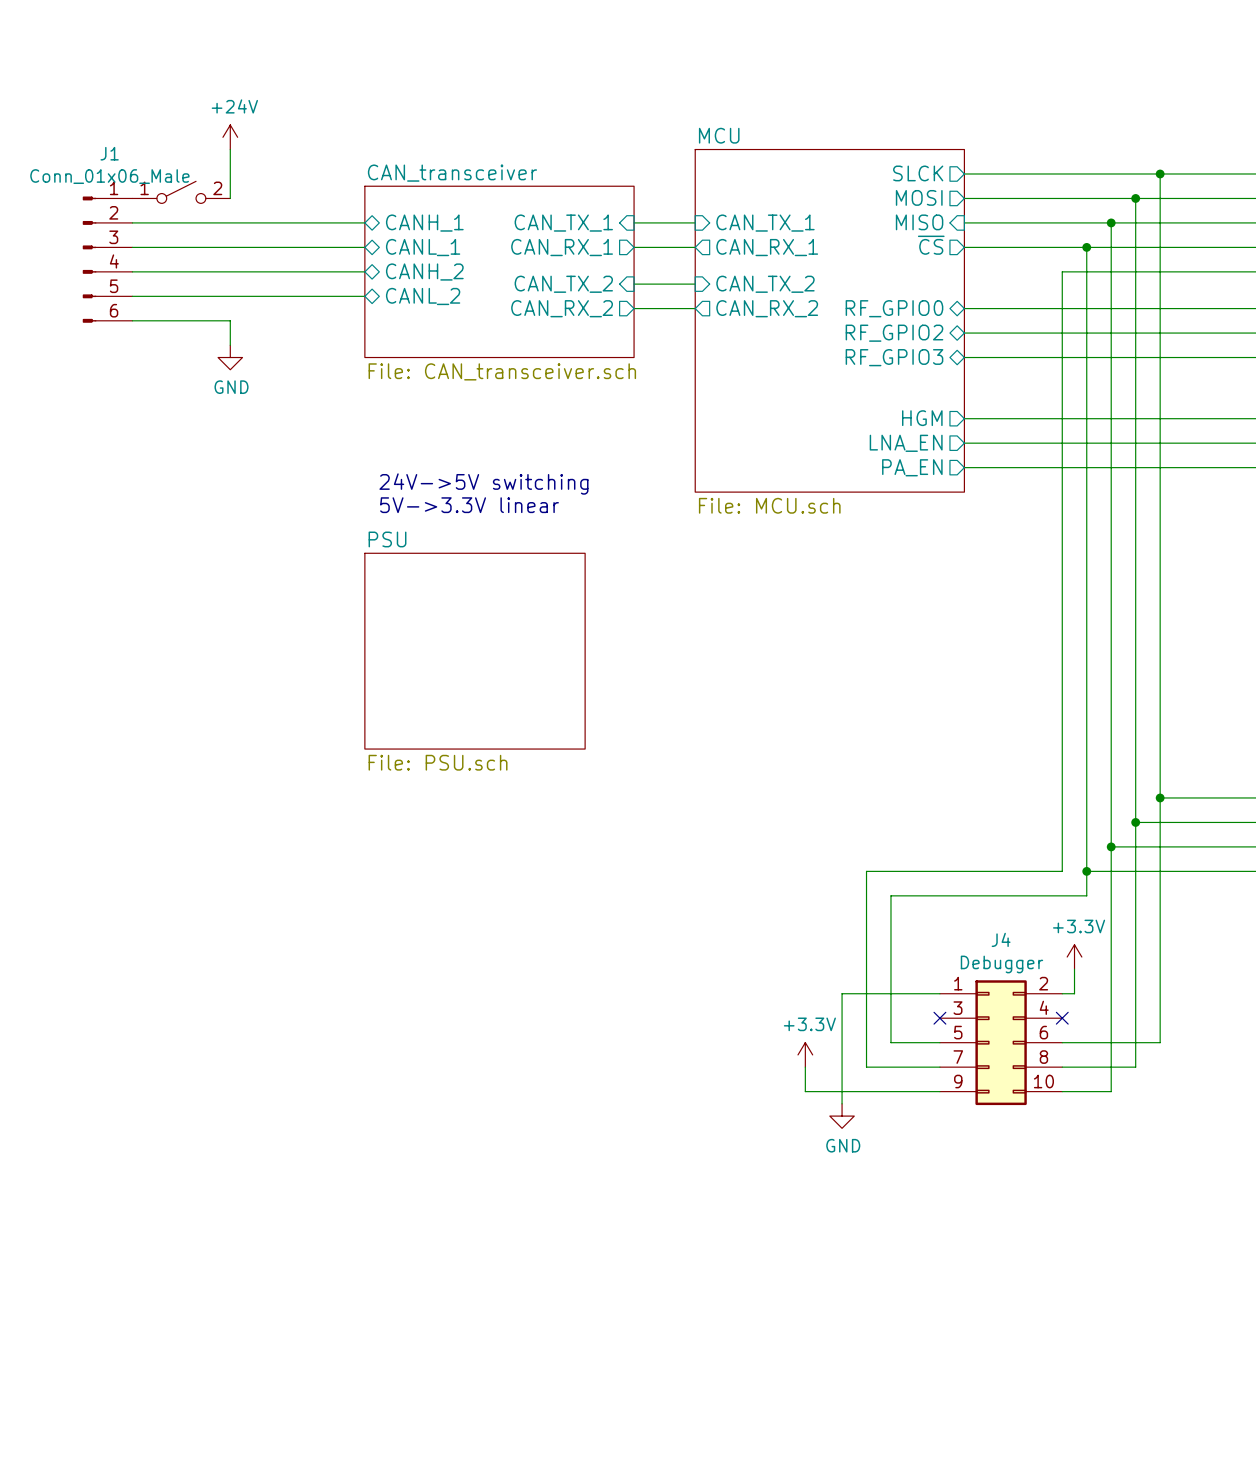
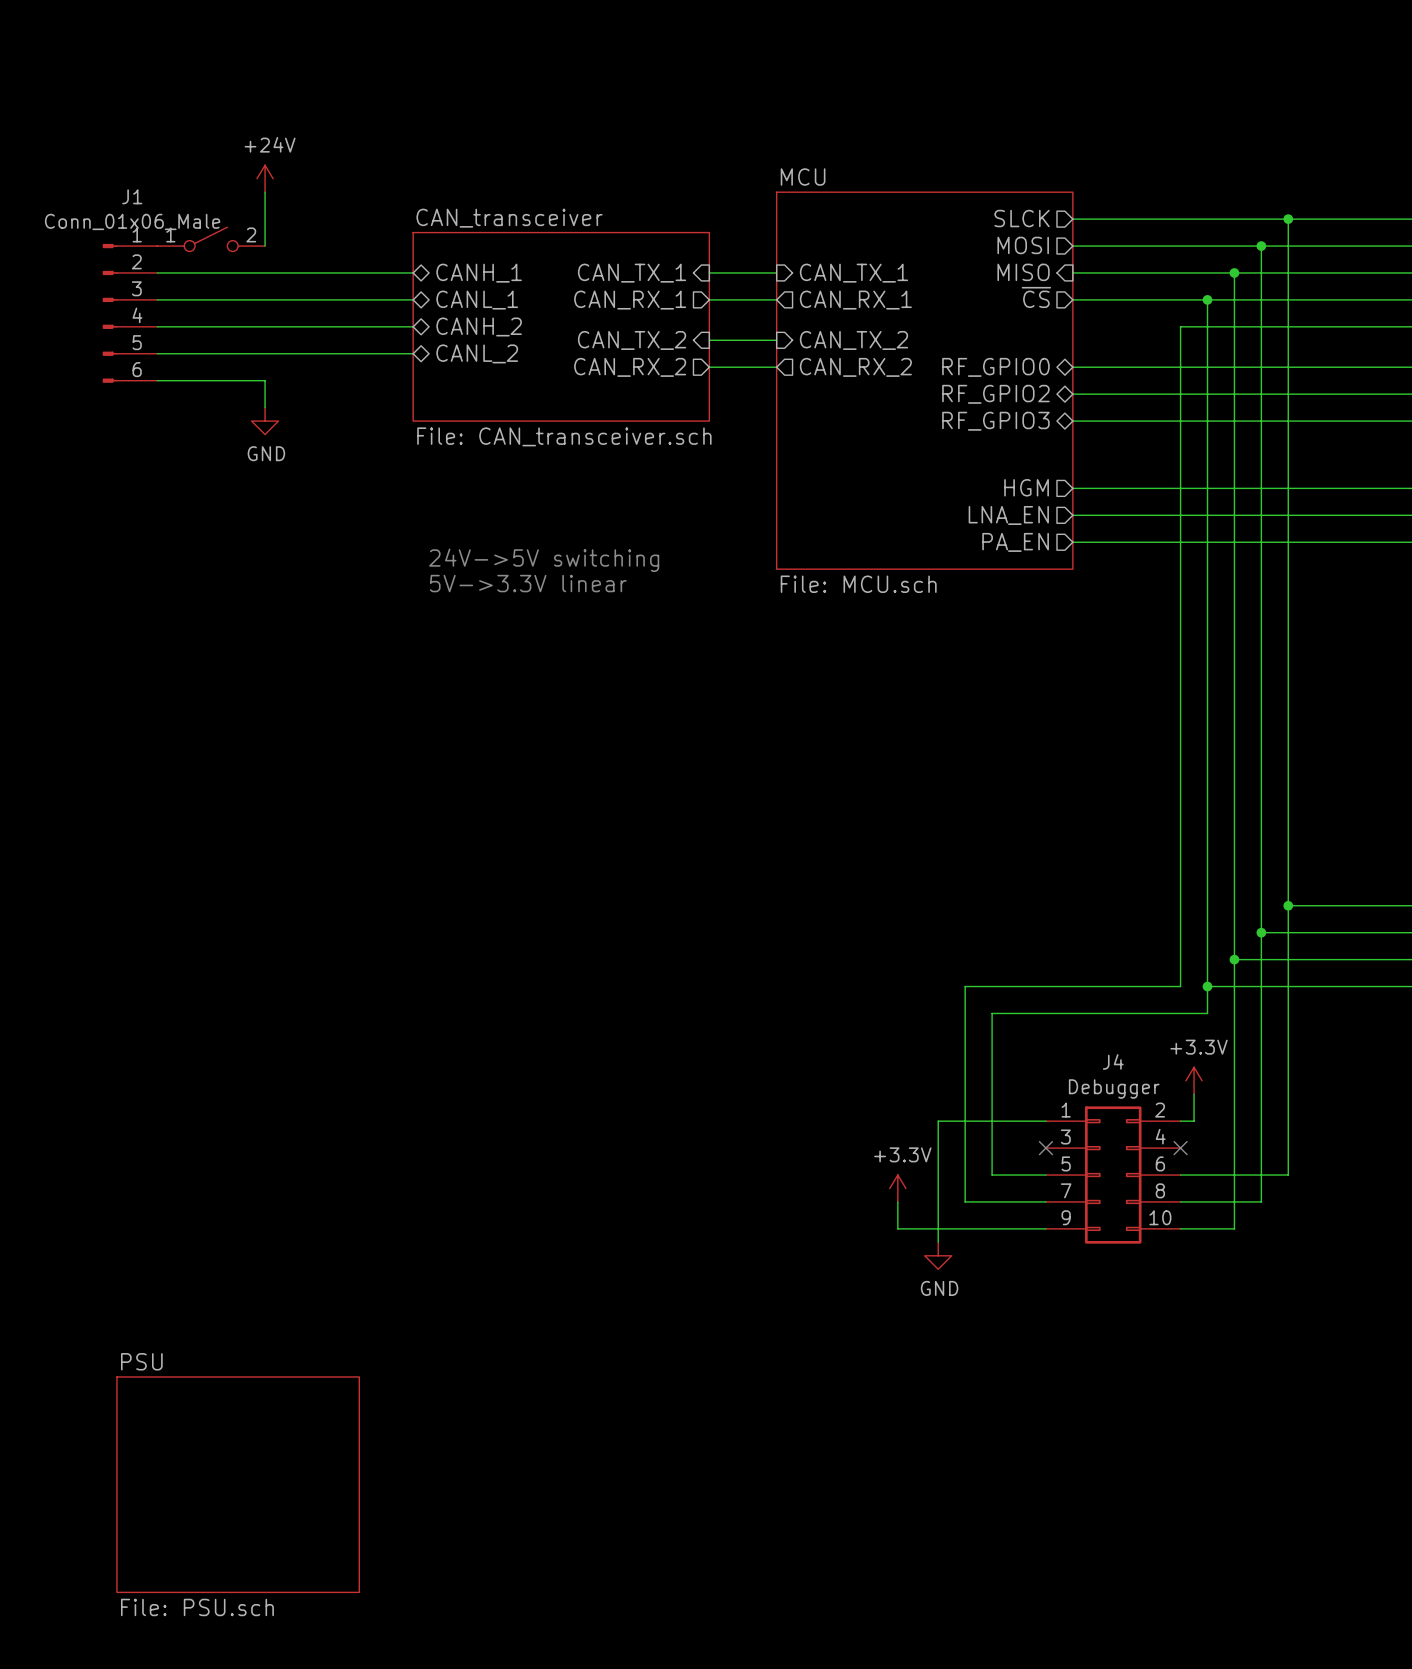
sheet PSU: File: PSU.sch (474, 651) -> none
sheet PSU: none -> File: PSU.sch (238, 1484)

